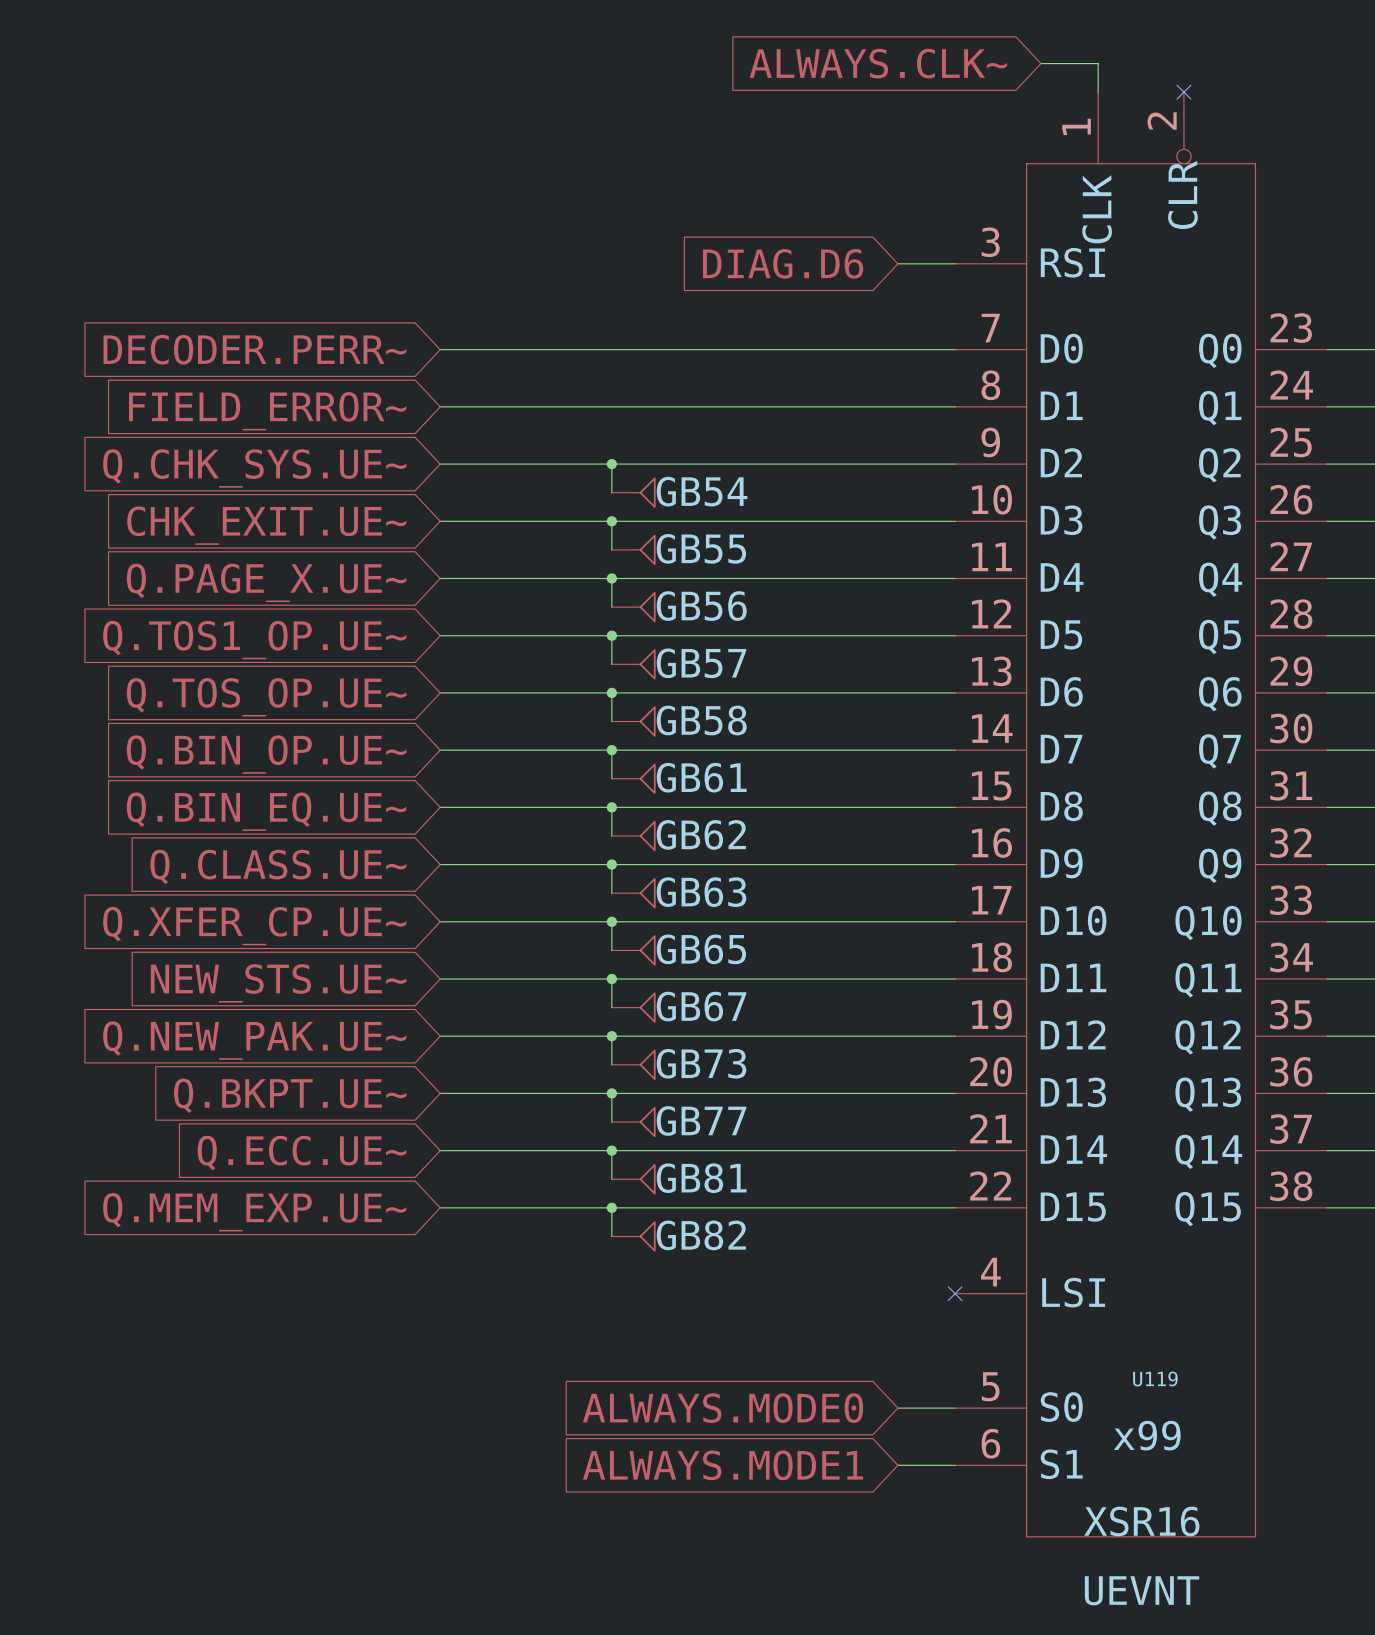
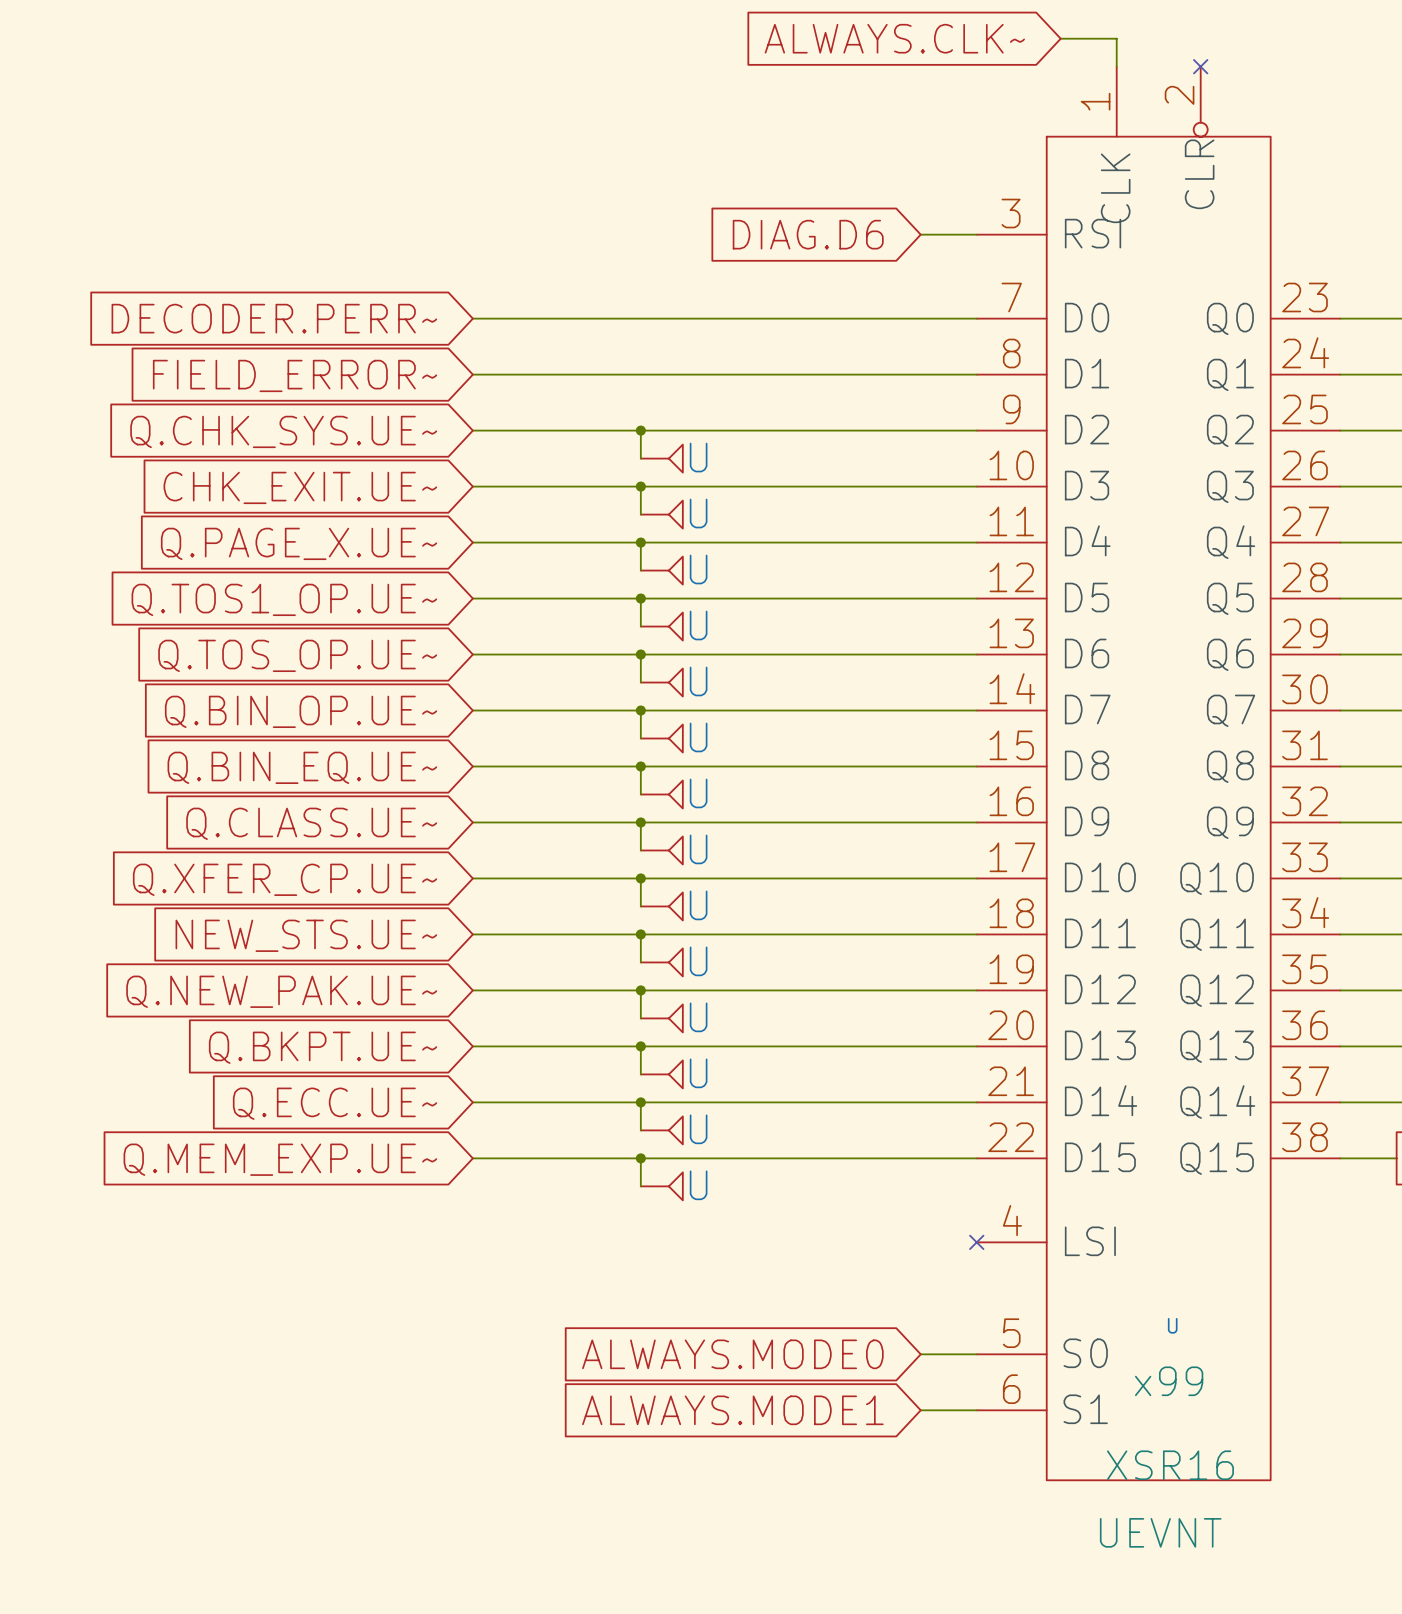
GB54 name: GB54 (702, 491) -> U (698, 457)
GB55 name: GB55 (701, 548) -> U (698, 513)
GB56 name: GB56 (701, 606) -> U (698, 569)
GB57 name: GB57 (701, 663) -> U (698, 625)
GB58 name: GB58 (701, 720) -> U (698, 681)
GB61 name: GB61 (701, 777) -> U (698, 737)
GB62 name: GB62 (701, 834) -> U (698, 793)
GB63 name: GB63 (701, 892) -> U (698, 849)
GB65 name: GB65 (701, 949) -> U (698, 905)
GB67 name: GB67 (701, 1006) -> U (698, 961)
GB73 name: GB73 (701, 1063) -> U (698, 1017)
GB77 name: GB77 (701, 1120) -> U (698, 1073)
GB81 name: GB81 (701, 1178) -> U (698, 1129)
GB82 name: GB82 (701, 1235) -> U (698, 1185)
U119 name: U119 (1155, 1378) -> U (1172, 1325)

